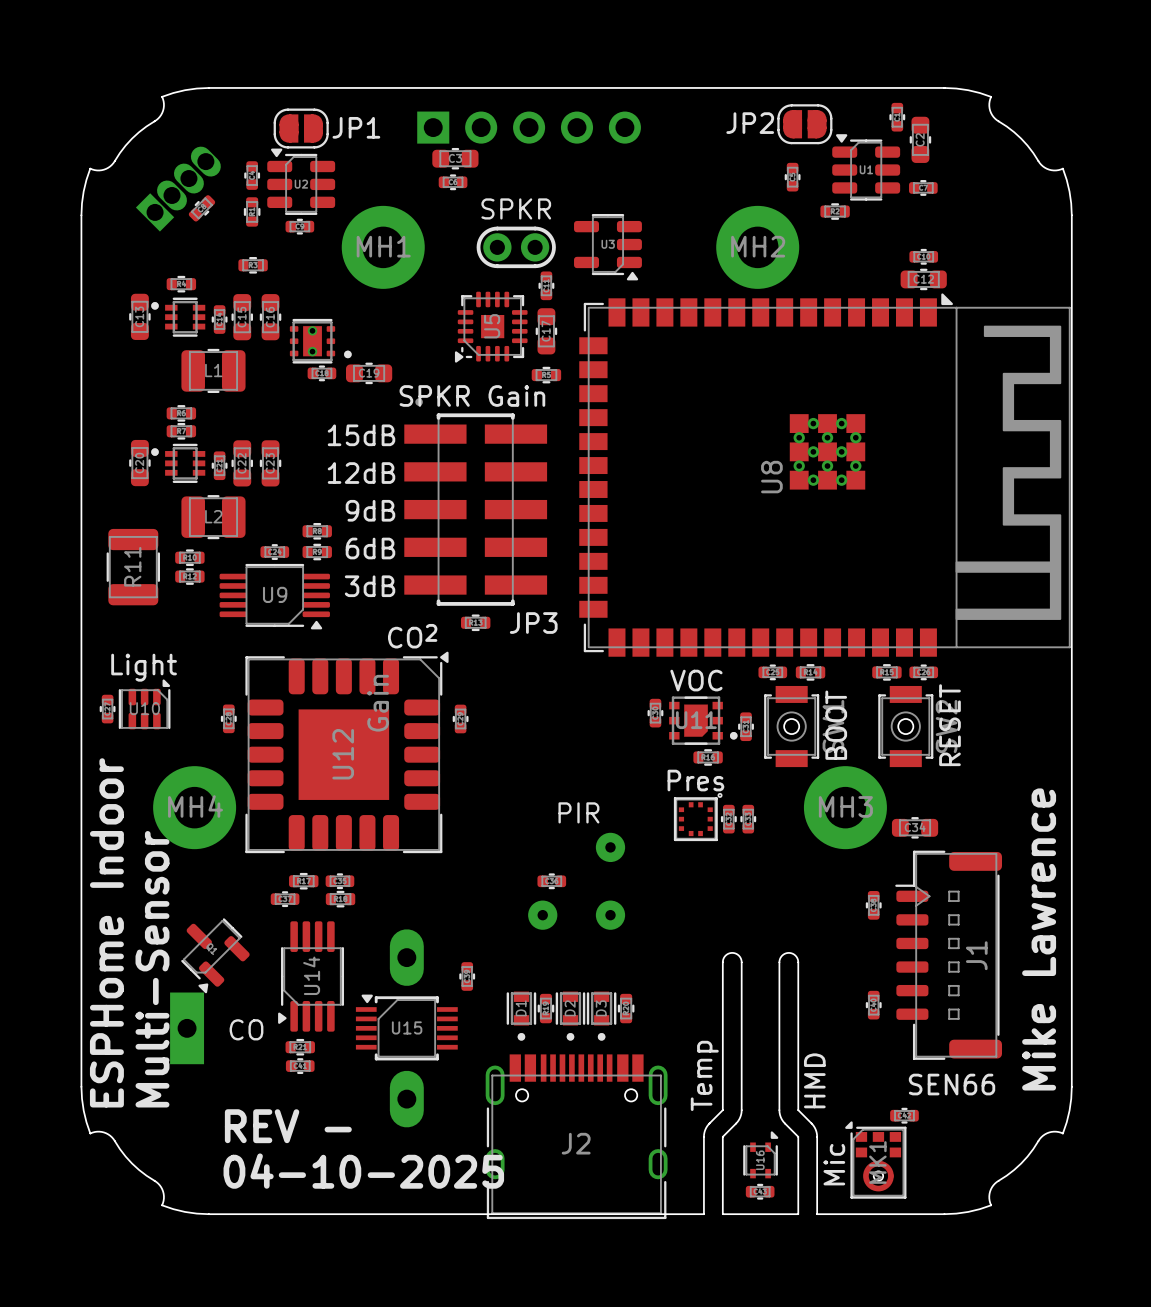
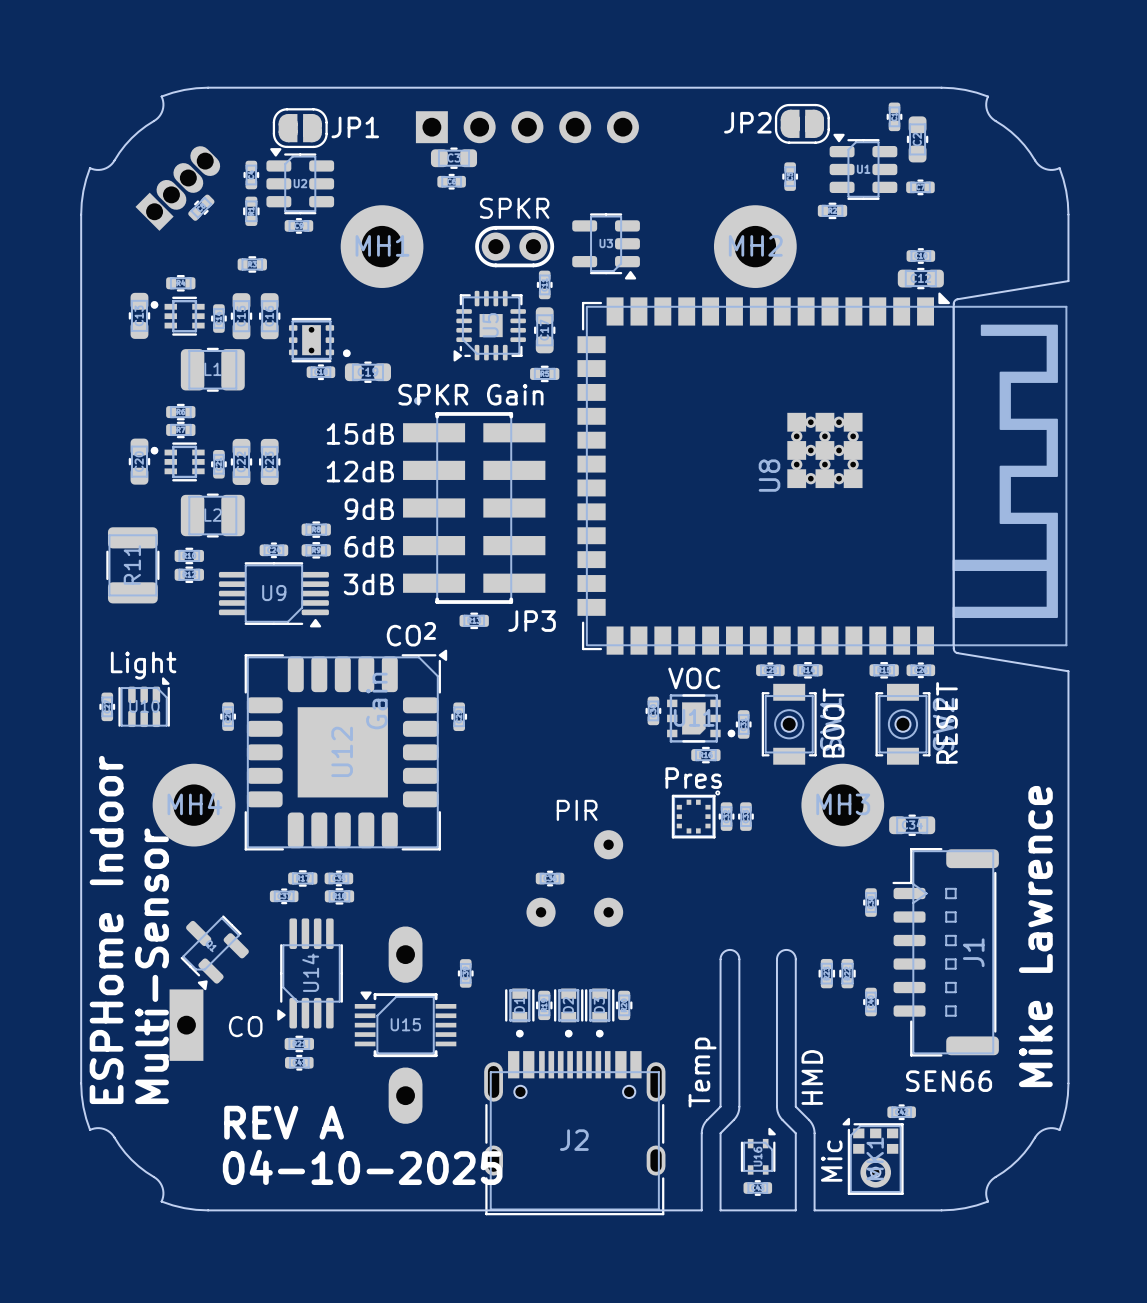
board edge: (1071, 281) (1071, 673) -> (1068, 281) (957, 299) (953, 303) (954, 650) (957, 653) (1068, 671)
part: none -> (826, 973)
part: none -> (847, 973)
text: REV - (288, 1126) -> REV A (284, 1122)

